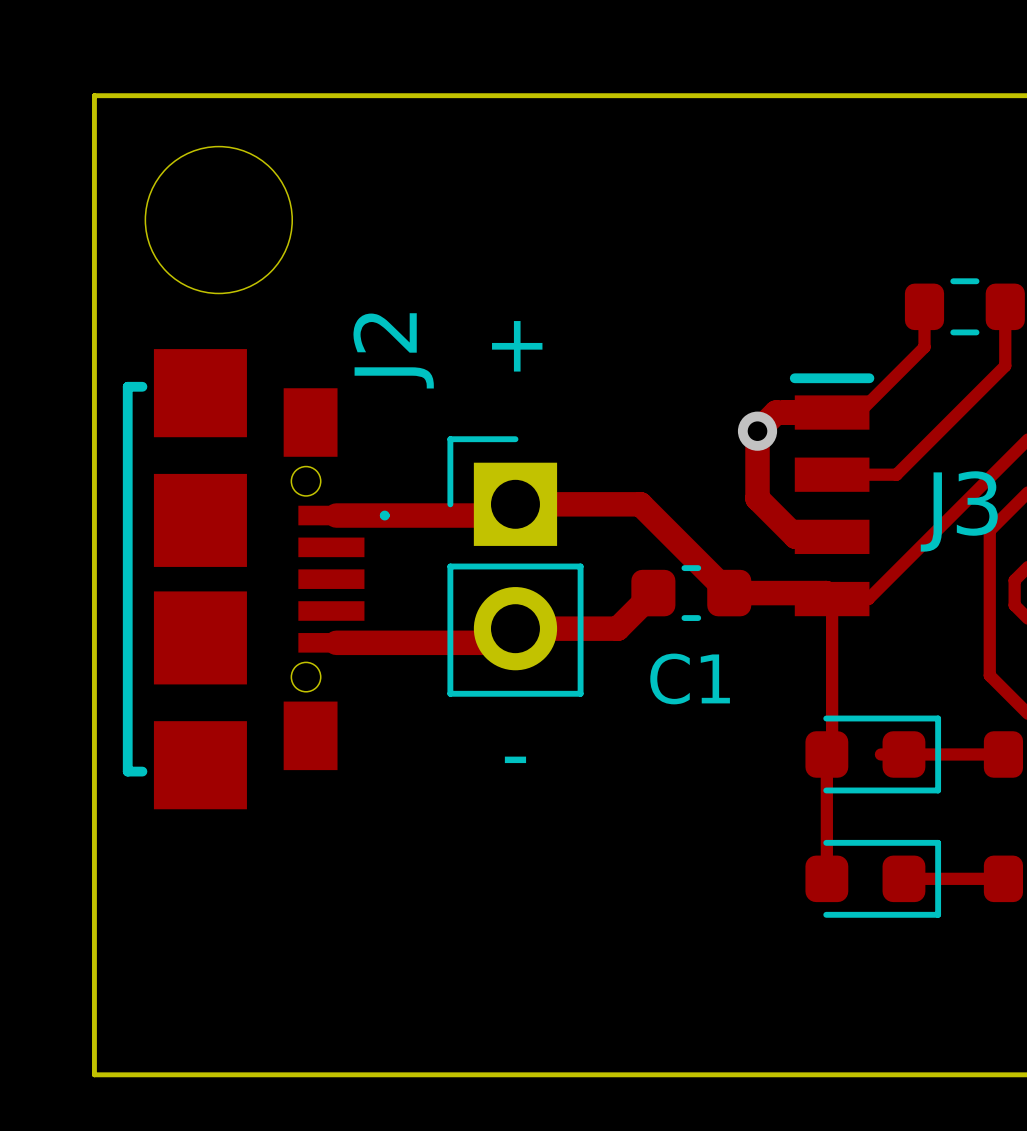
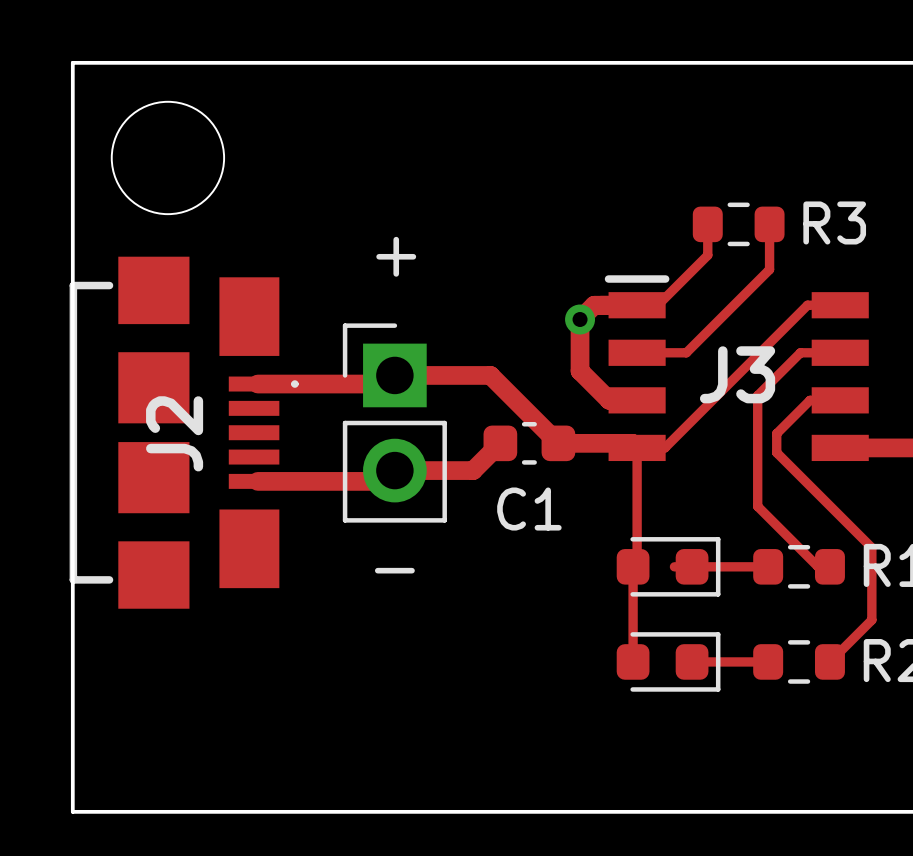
J2 footprint: [122, 349, 390, 810] -> [69, 256, 299, 609]
J2 name position: J2 (393, 350) -> J2 (174, 433)

